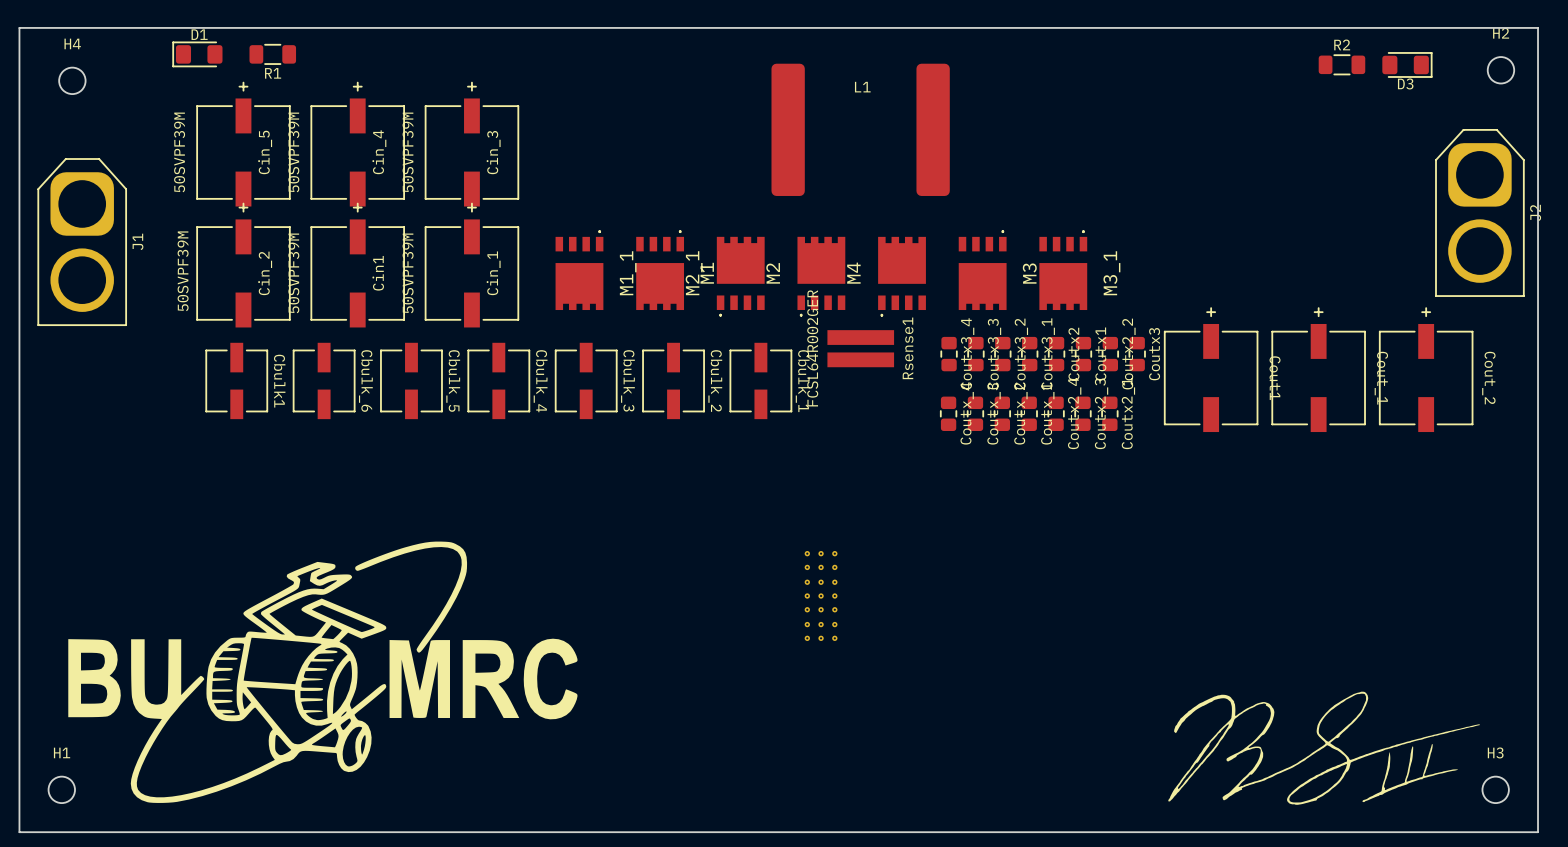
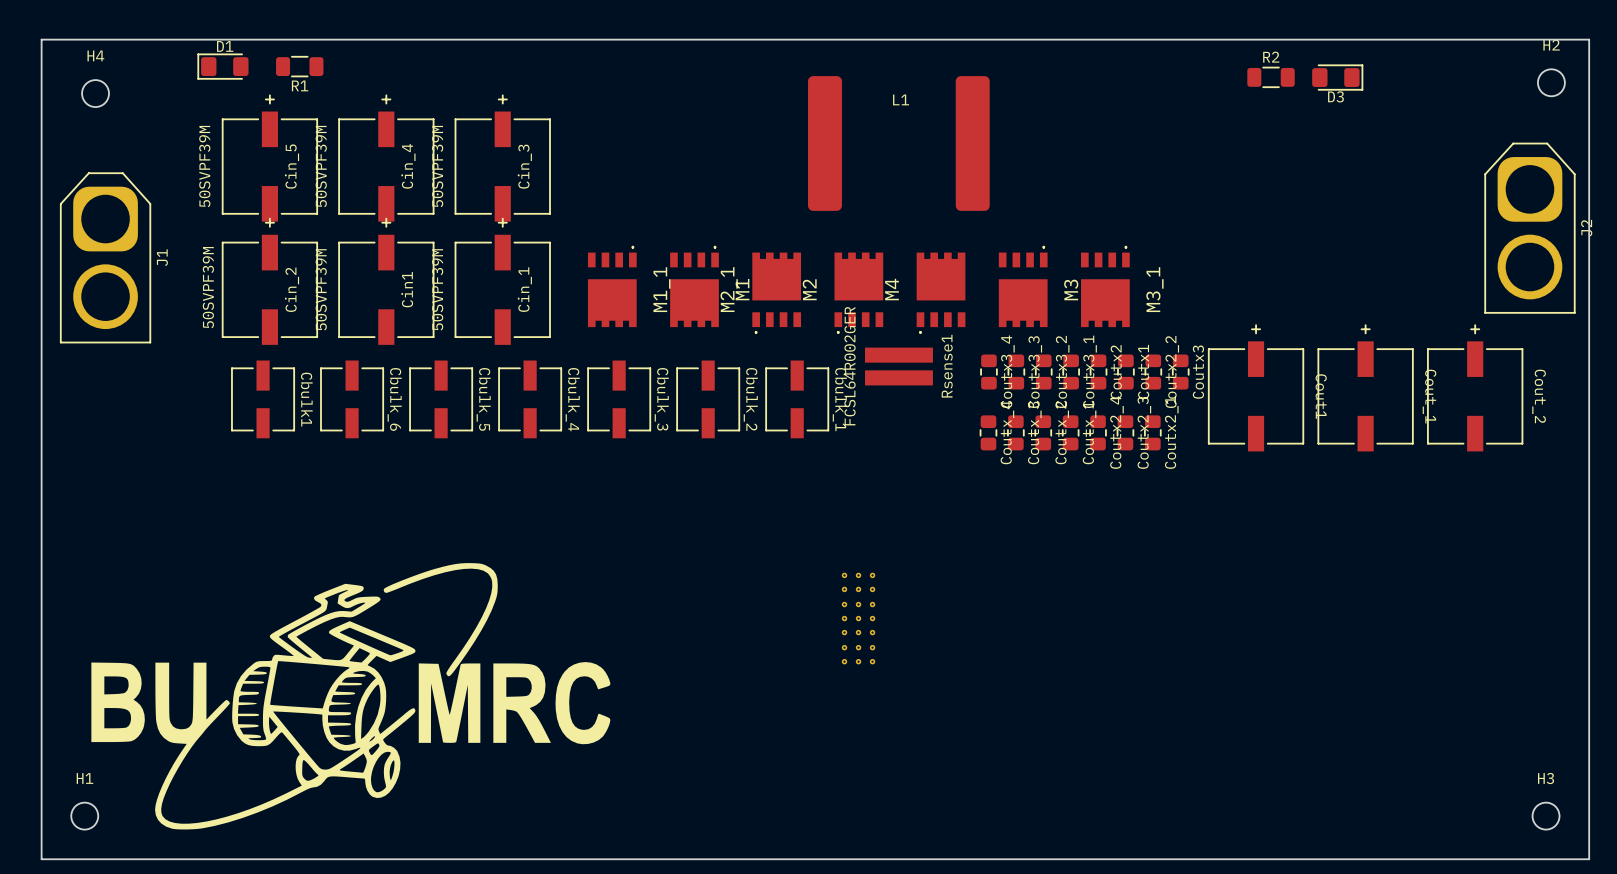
R2 position: (1341, 64) -> (1271, 77)
D3 position: (1407, 64) -> (1337, 77)
drawing: [1168, 691, 1481, 805] -> none

